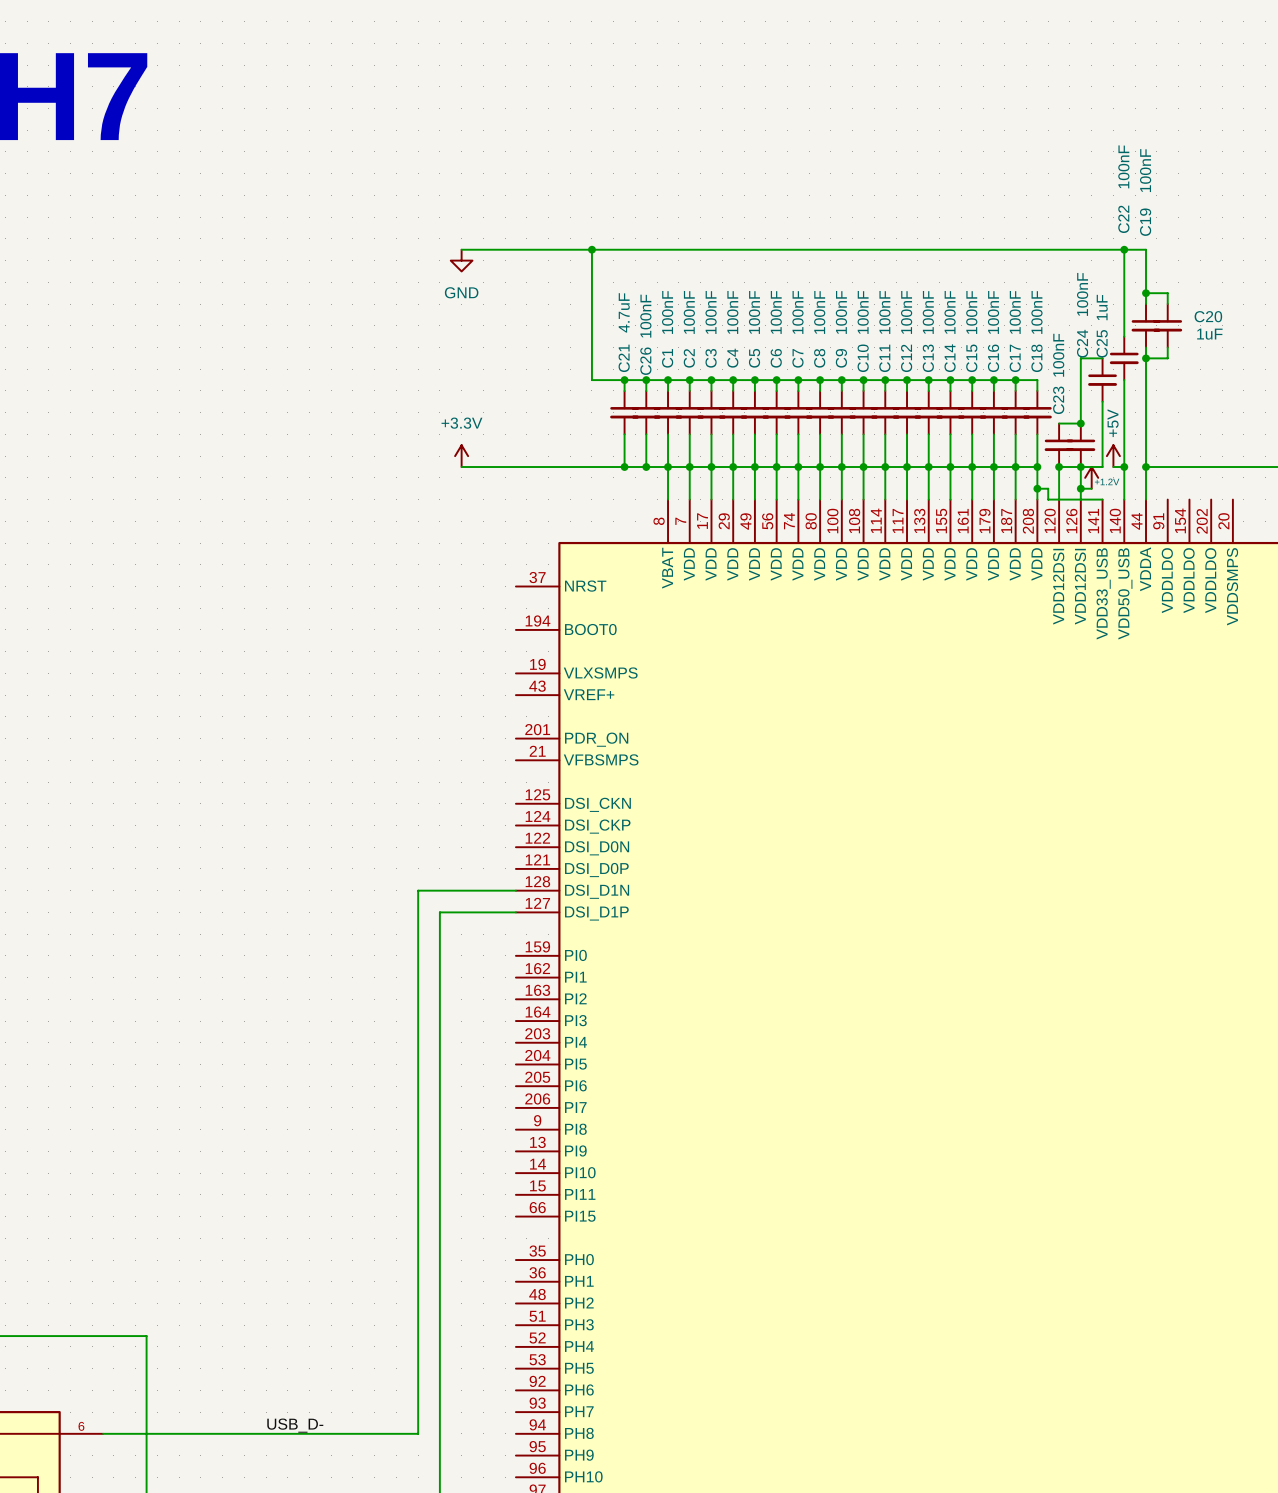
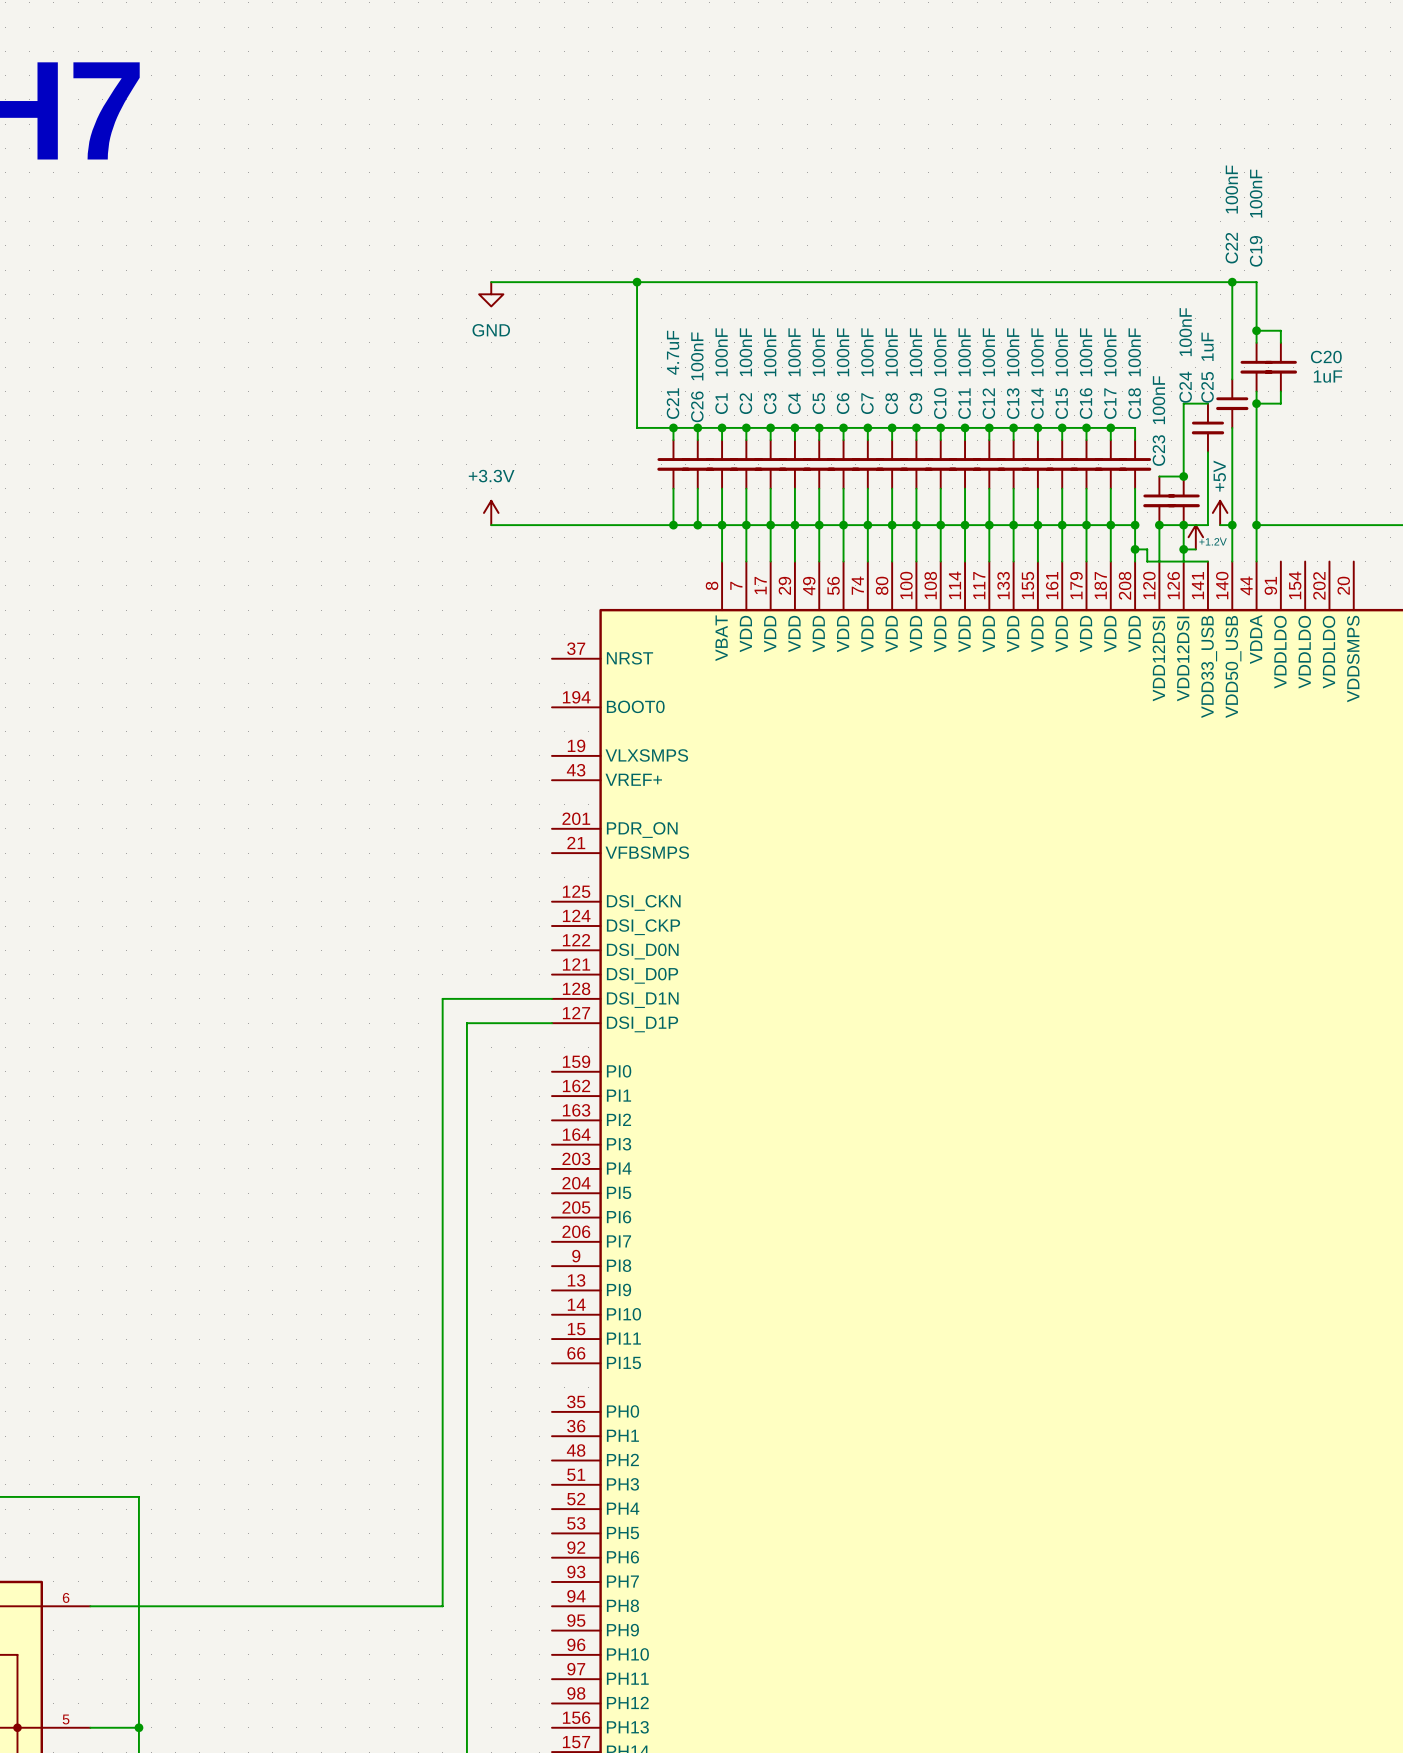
label: USB_D- (295, 1425) -> none

